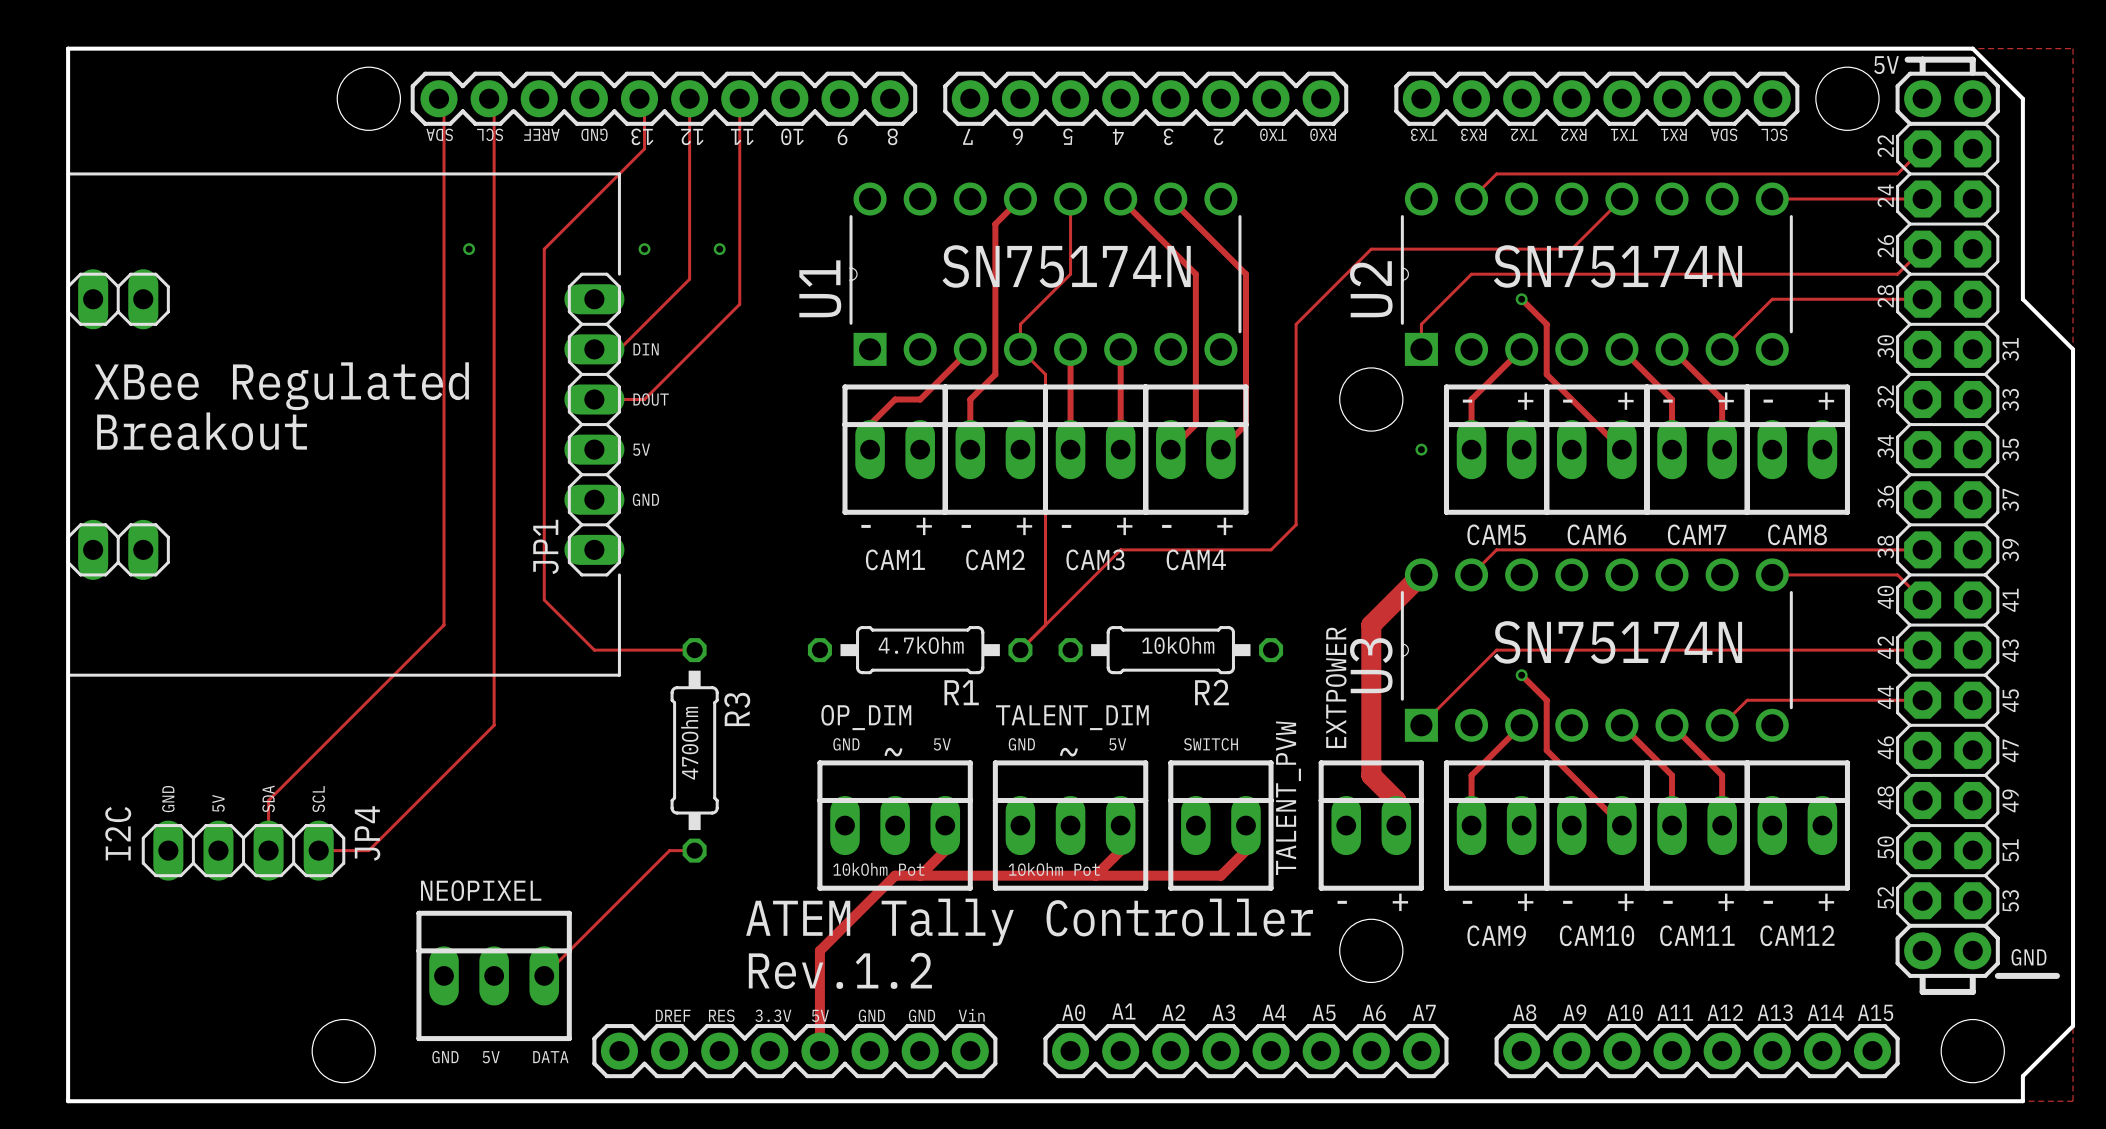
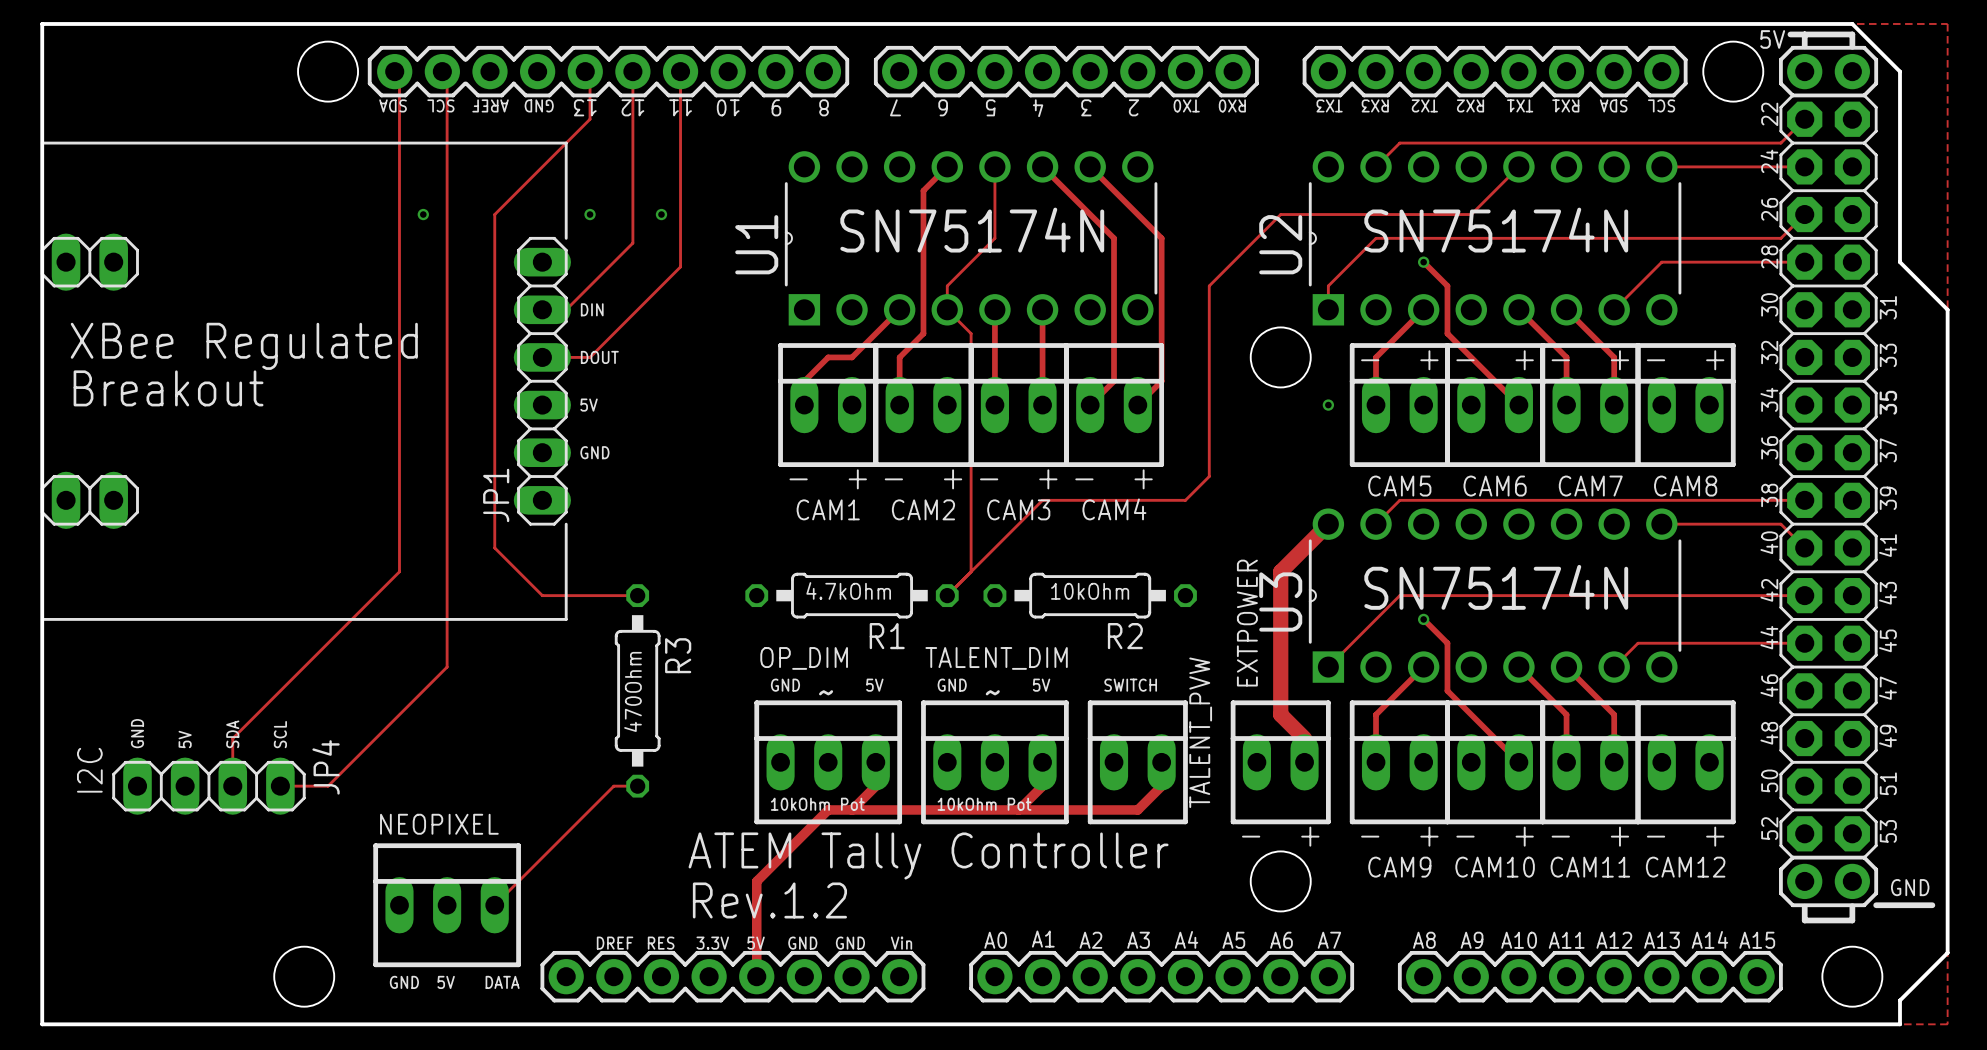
track width: thick (1421, 574) (1371, 625) (1371, 775) (1396, 800) (1396, 825) -> thin (1328, 524) (1280, 571) (1280, 714) (1304, 738) (1304, 762)

